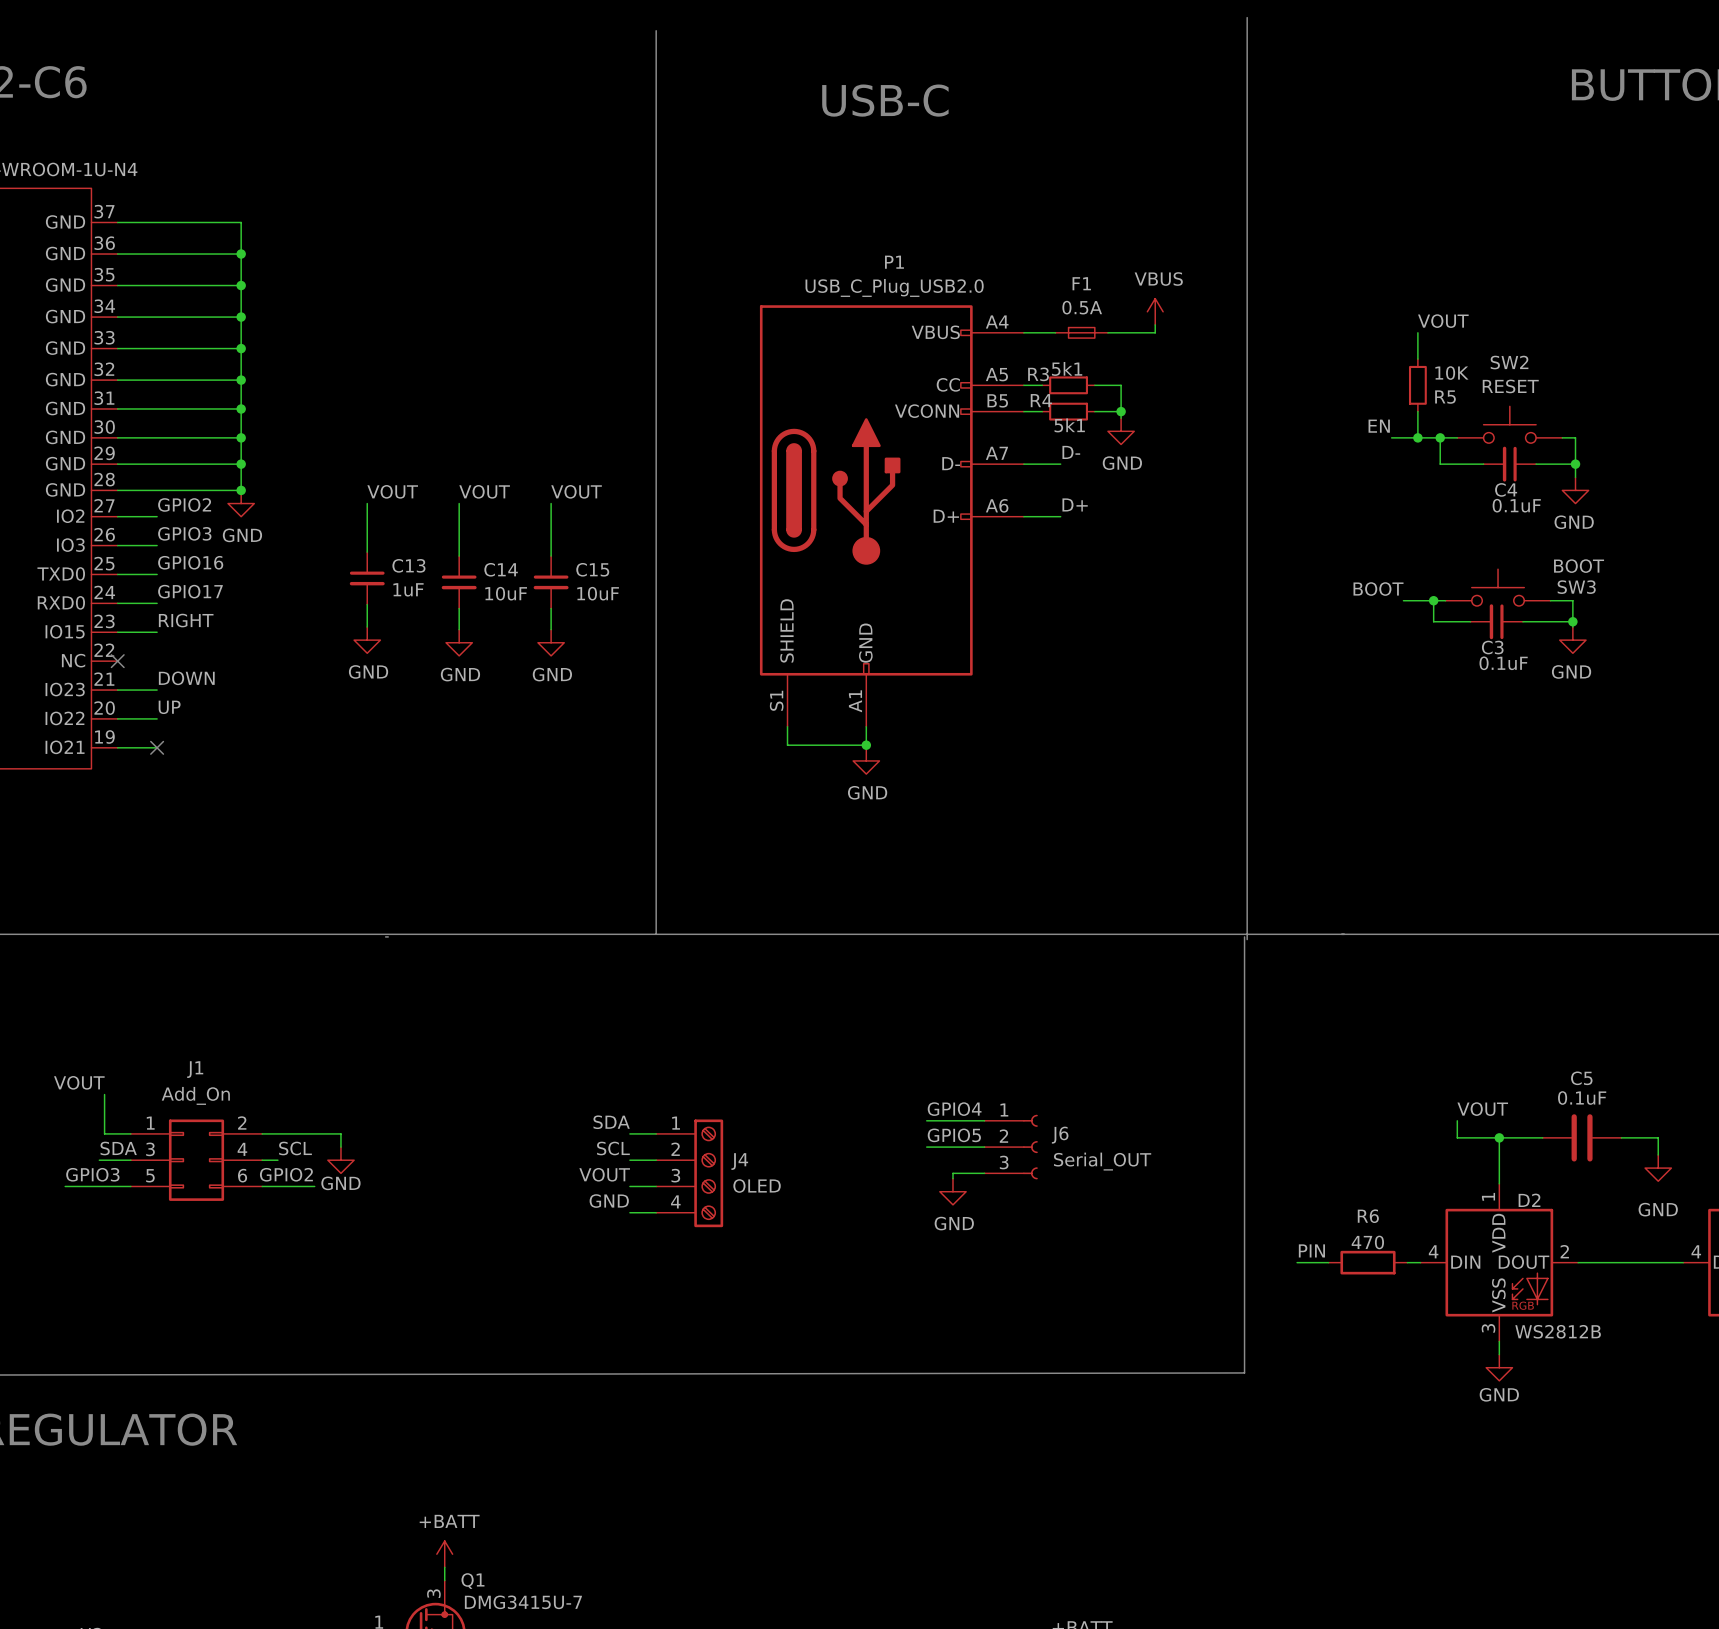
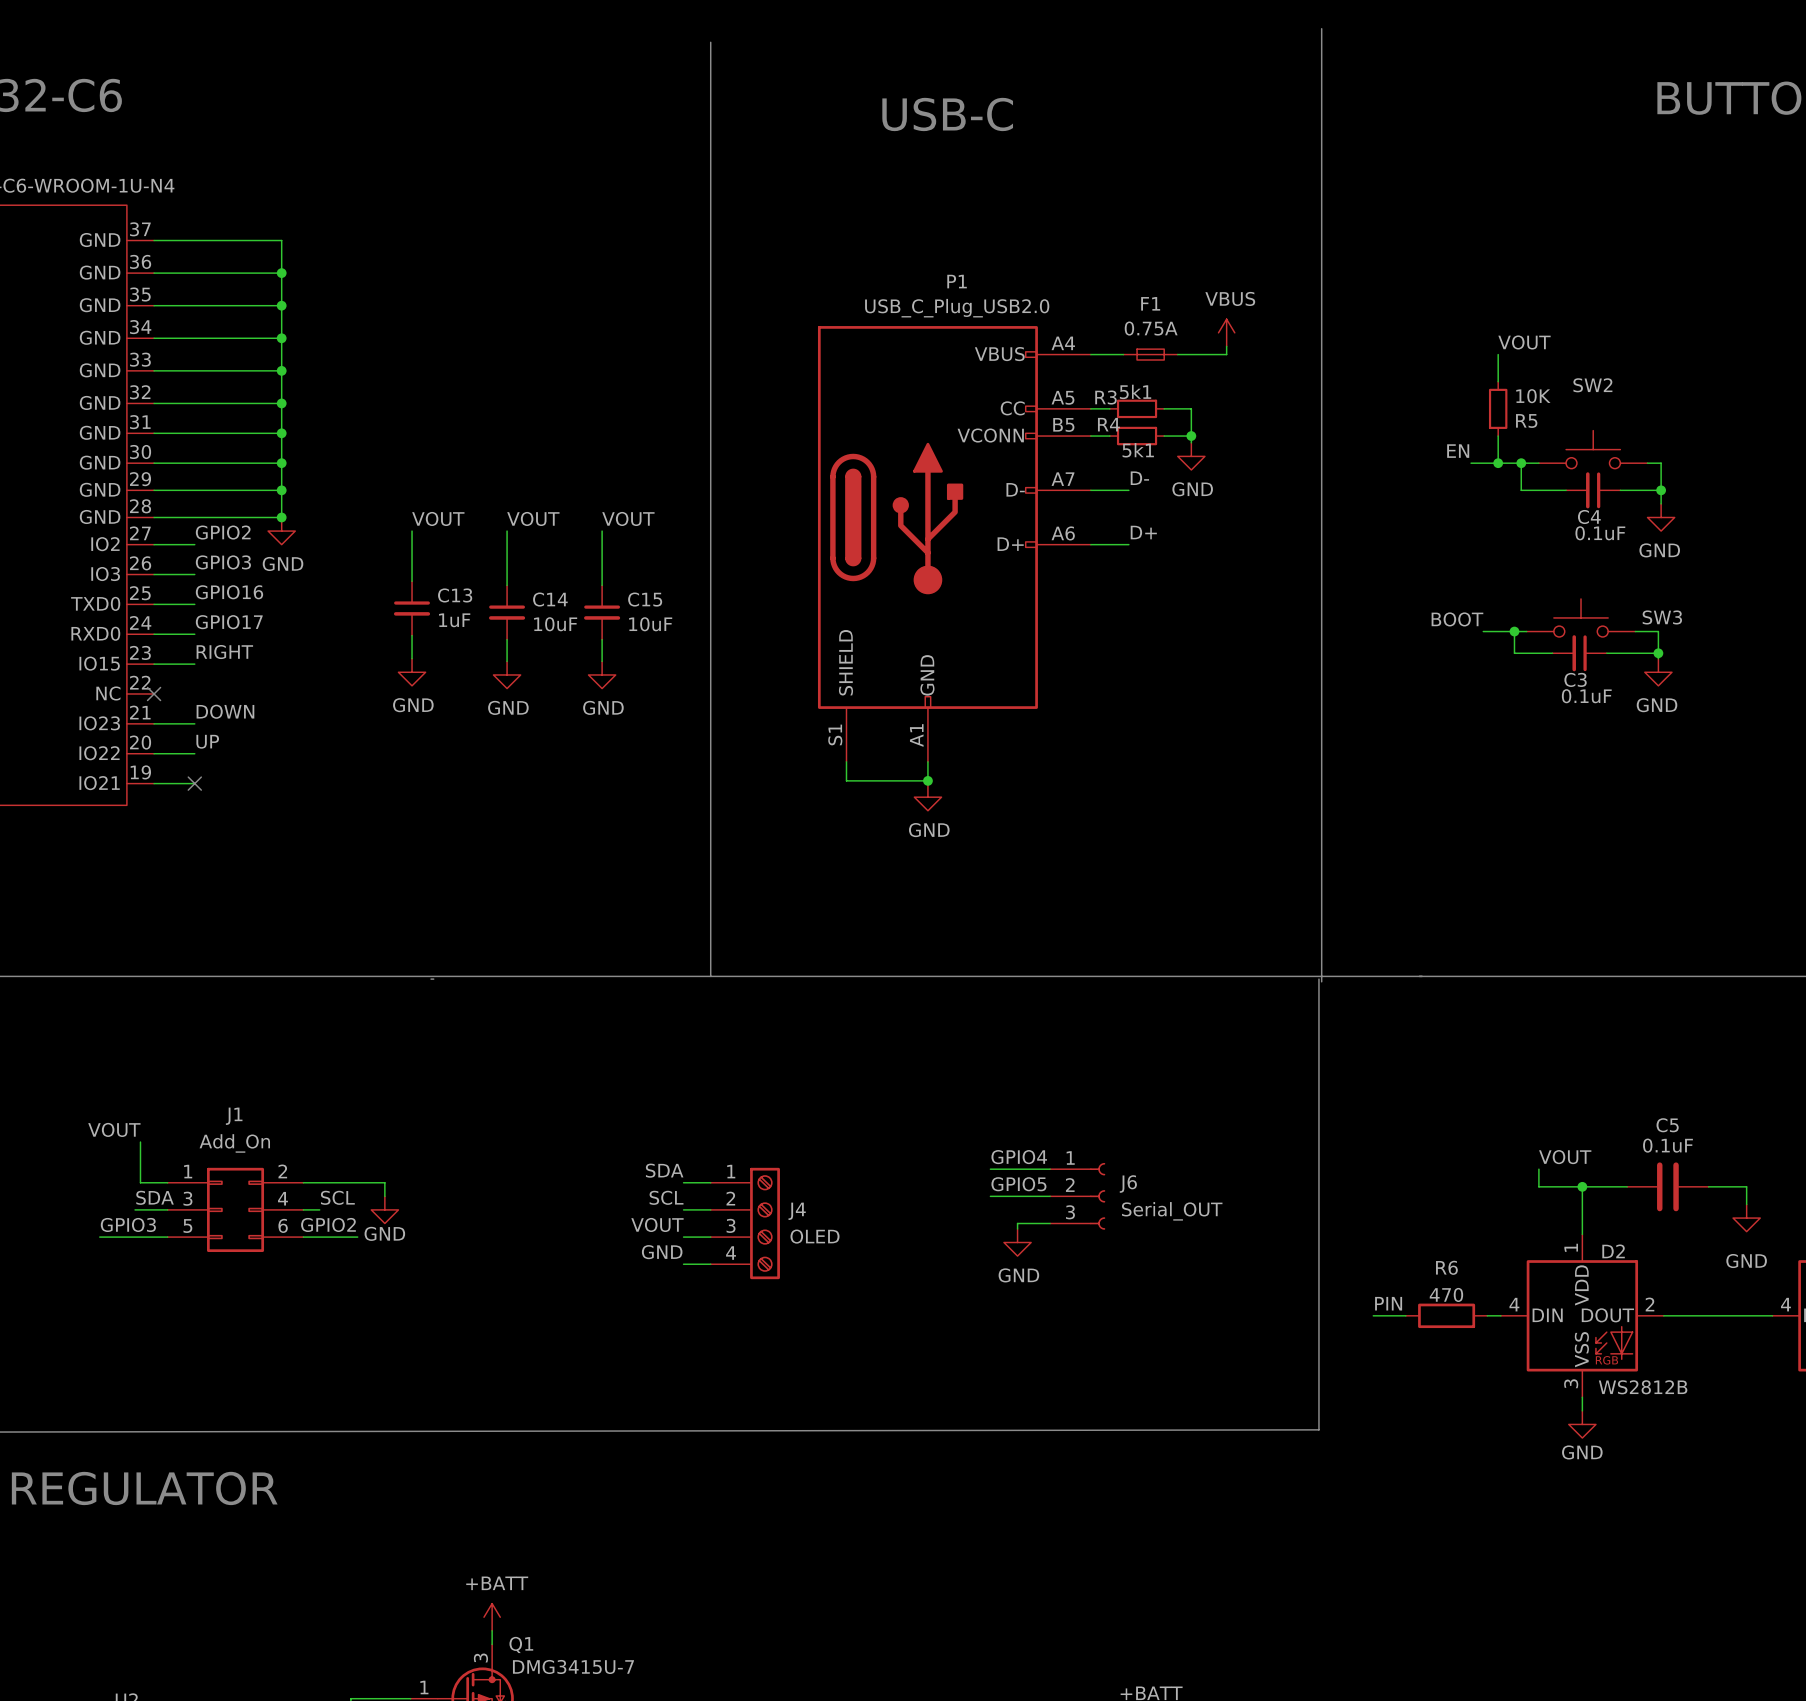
F1 value: 0.5A (1082, 307) -> 0.75A (1151, 328)
SW2 value: RESET (1510, 386) -> none
SW3 value: BOOT (1579, 566) -> none

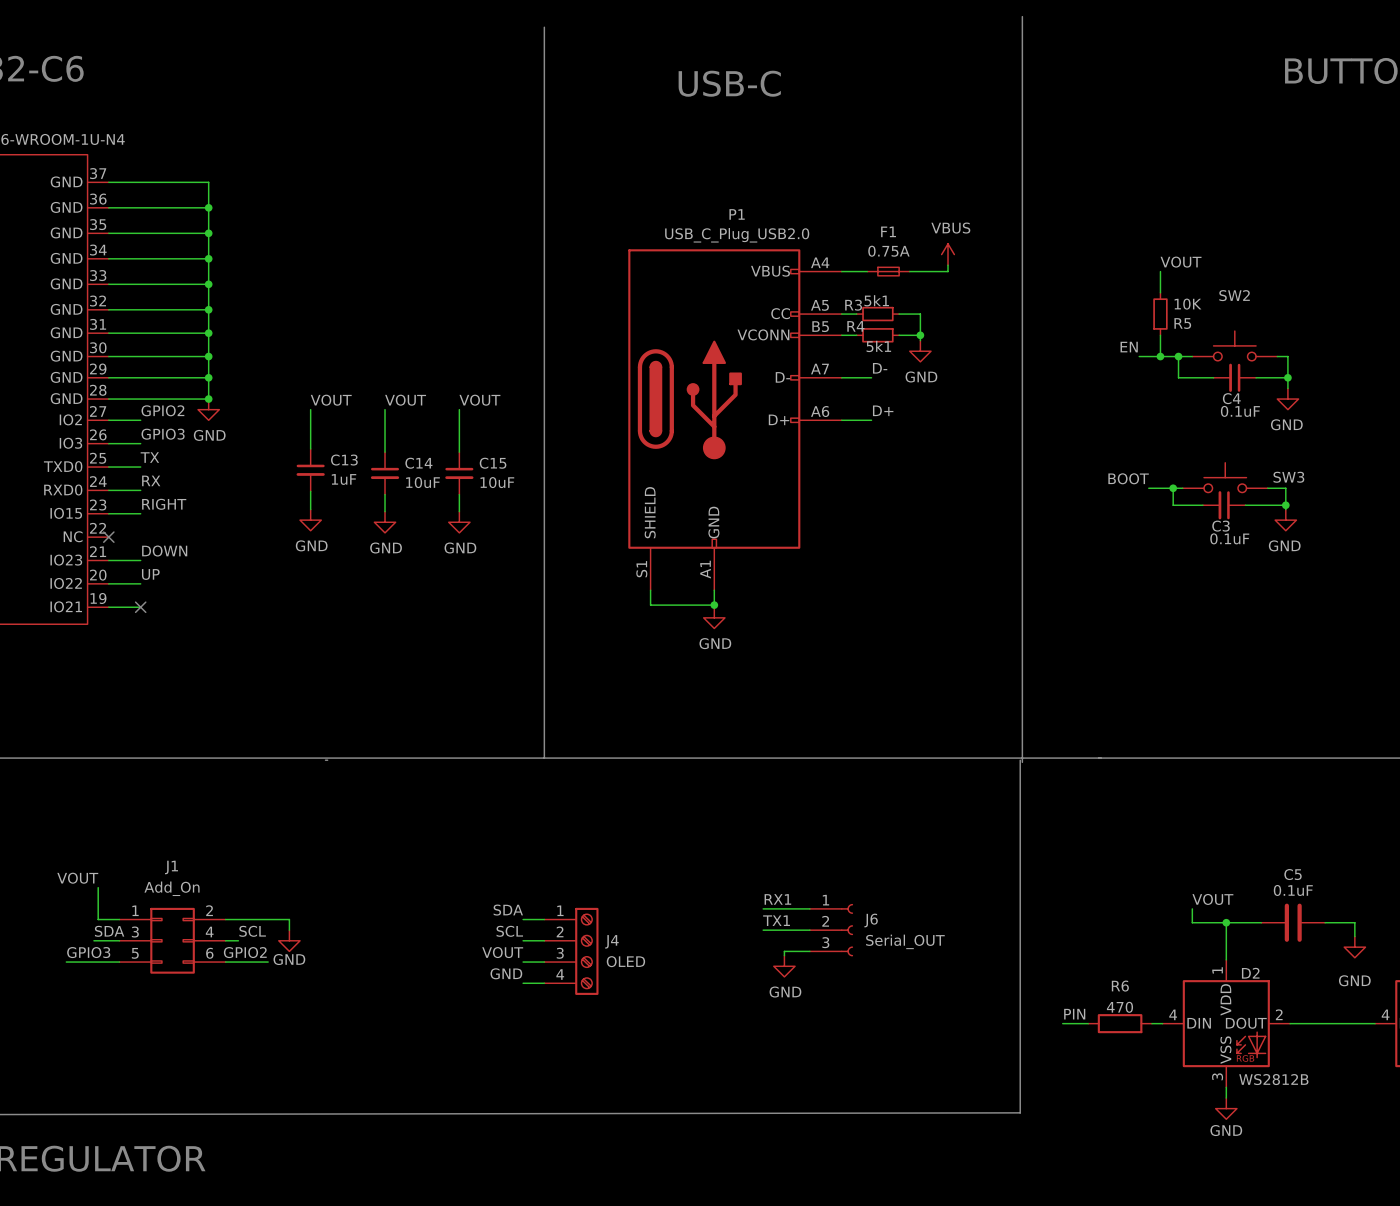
label: GPIO16 (229, 592) -> TX (149, 457)
label: GPIO17 (229, 622) -> RX (151, 480)
label: GPIO4 (1019, 1157) -> RX1 (777, 899)
label: GPIO5 (1018, 1184) -> TX1 (776, 920)

